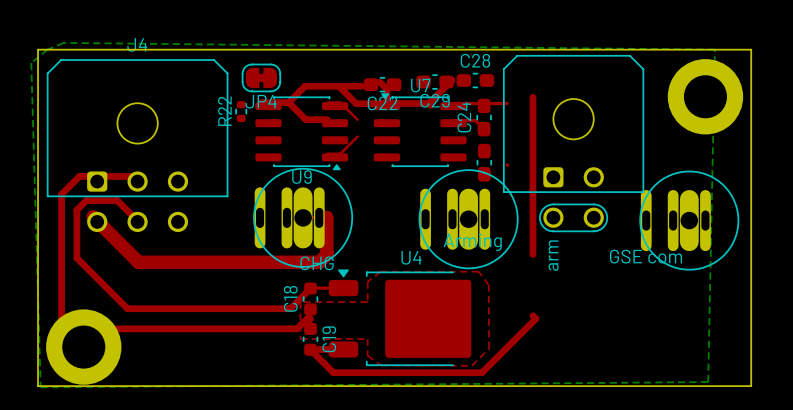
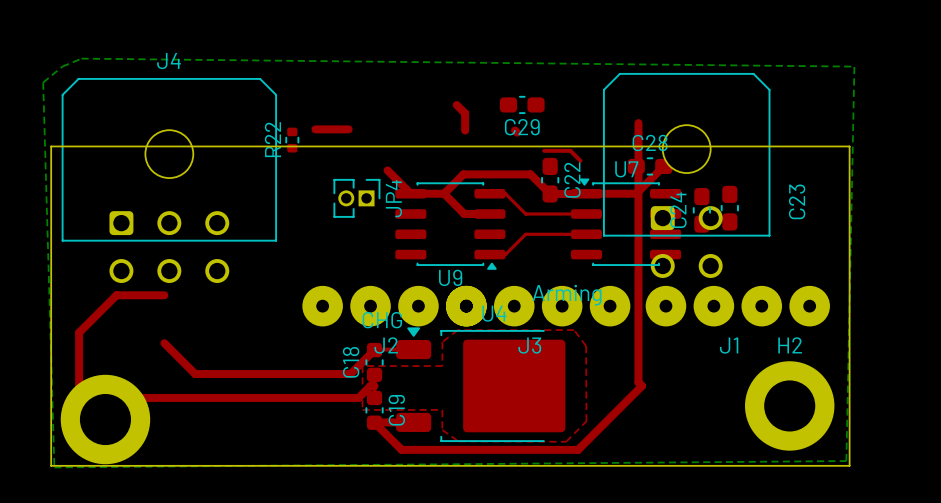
JP4 footprint: [241, 63, 282, 93] -> [333, 178, 381, 218]
top track: (451, 80) (428, 103) (356, 103) (339, 87) -> none
C28 position: (475, 80) -> (649, 166)
C22 rotation: 0° (382, 84) -> 90° clockwise (550, 180)
C22 position: (382, 84) -> (550, 180)
top track: (361, 86) (305, 86) (288, 102) (305, 119) (327, 119) -> none
part: (705, 96) -> none
JP4 name position: JP4 (261, 101) -> JP4 (393, 198)
top track: (327, 102) (340, 102) (357, 119) -> none
C22 name position: C22 (382, 103) -> C22 (572, 180)
top track: (453, 103) (507, 103) -> none
board edge: (38, 116) (38, 49) (751, 49) (751, 386) (710, 386) -> (51, 146) (849, 146) (849, 465)
C24 position: (484, 117) -> (701, 210)
U7 position: (420, 130) -> (626, 222)
U9 position: (301, 133) -> (450, 226)
top track: none -> (663, 166) (636, 193) (550, 193) (530, 174) (463, 174) (444, 193)
top track: (357, 136) (340, 153) (327, 153) -> none
top track: none -> (387, 170) (410, 193) (444, 193)
top track: none -> (444, 193) (464, 214) (489, 214)
top track: none -> (489, 193) (505, 193) (525, 214) (586, 214)
part: (484, 162) -> none
top track: (507, 164) (507, 165) -> none
C23: none -> (729, 208)
top track: (133, 176) (79, 176) (61, 194) (61, 273) -> (164, 295) (116, 295) (79, 332)
top track: none -> (586, 234) (525, 234) (505, 254) (489, 254)
line: (553, 204) (598, 205) (606, 213) (606, 222) (601, 228) (595, 231) (548, 230) (541, 224) (540, 214) (545, 206) (553, 204) -> none
top track: (93, 216) (138, 262) (319, 262) (327, 254) (326, 217) (310, 217) -> none
top track: (133, 216) (117, 200) (86, 200) (76, 210) (76, 258) (127, 308) (159, 308) -> (164, 343) (195, 374)
part: (303, 217) -> none
part: (468, 219) -> none
part: (689, 220) -> none
J2: none -> (394, 306)
J3: none -> (538, 306)
J1: none -> (737, 306)
top track: none -> (638, 309) (638, 382)
text: arm (553, 255) -> none
text: GSE com (646, 256) -> none
H2: none -> (789, 405)

